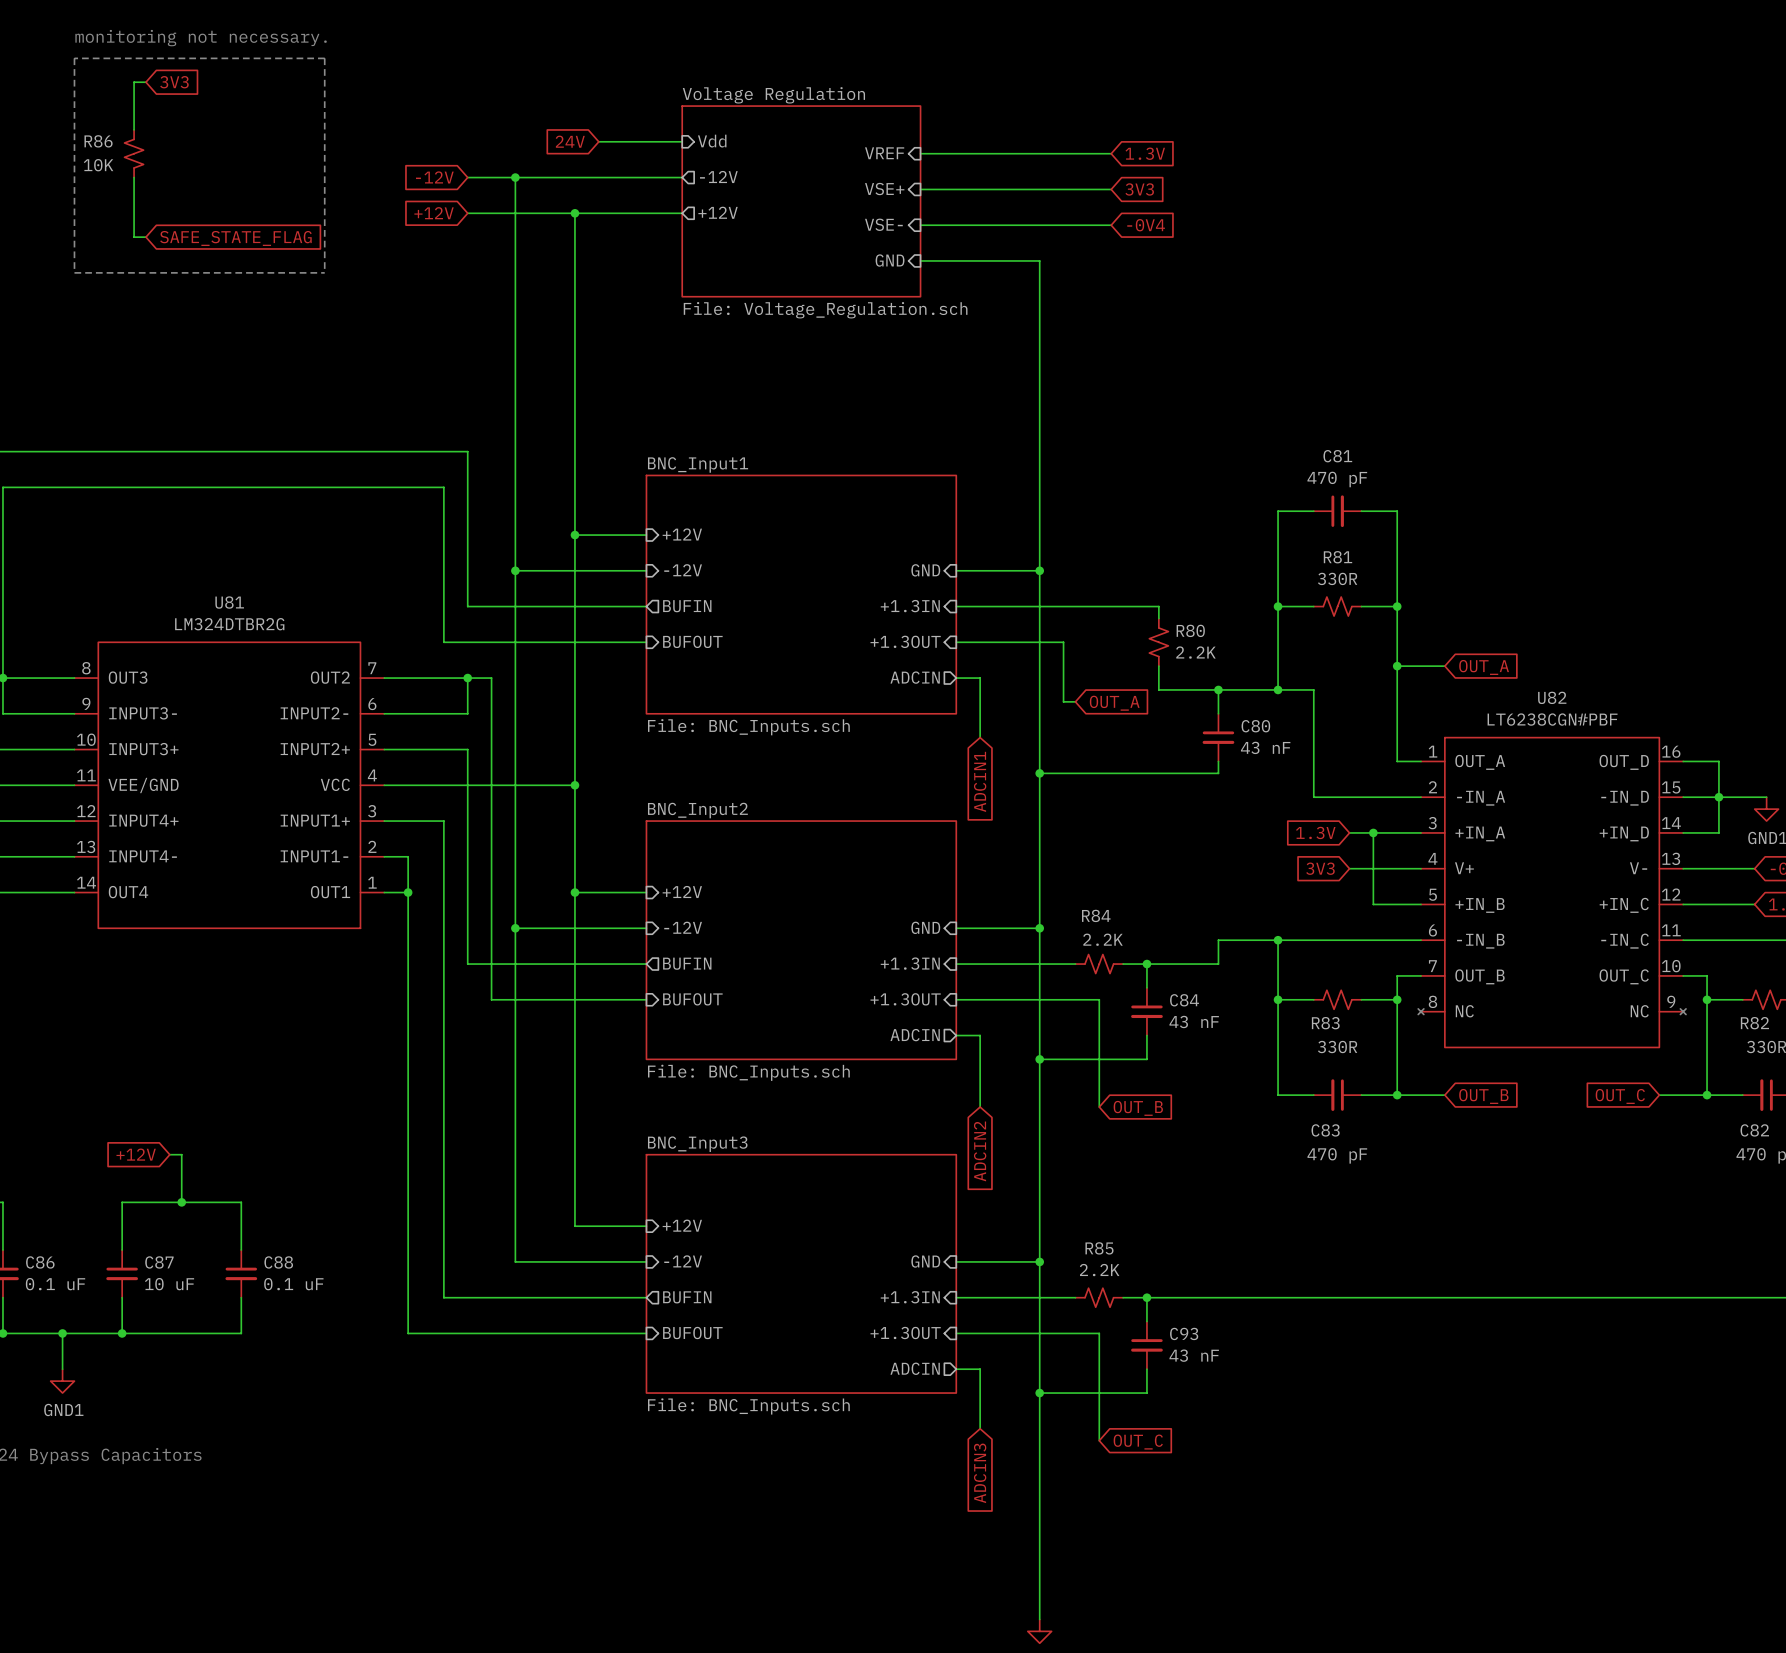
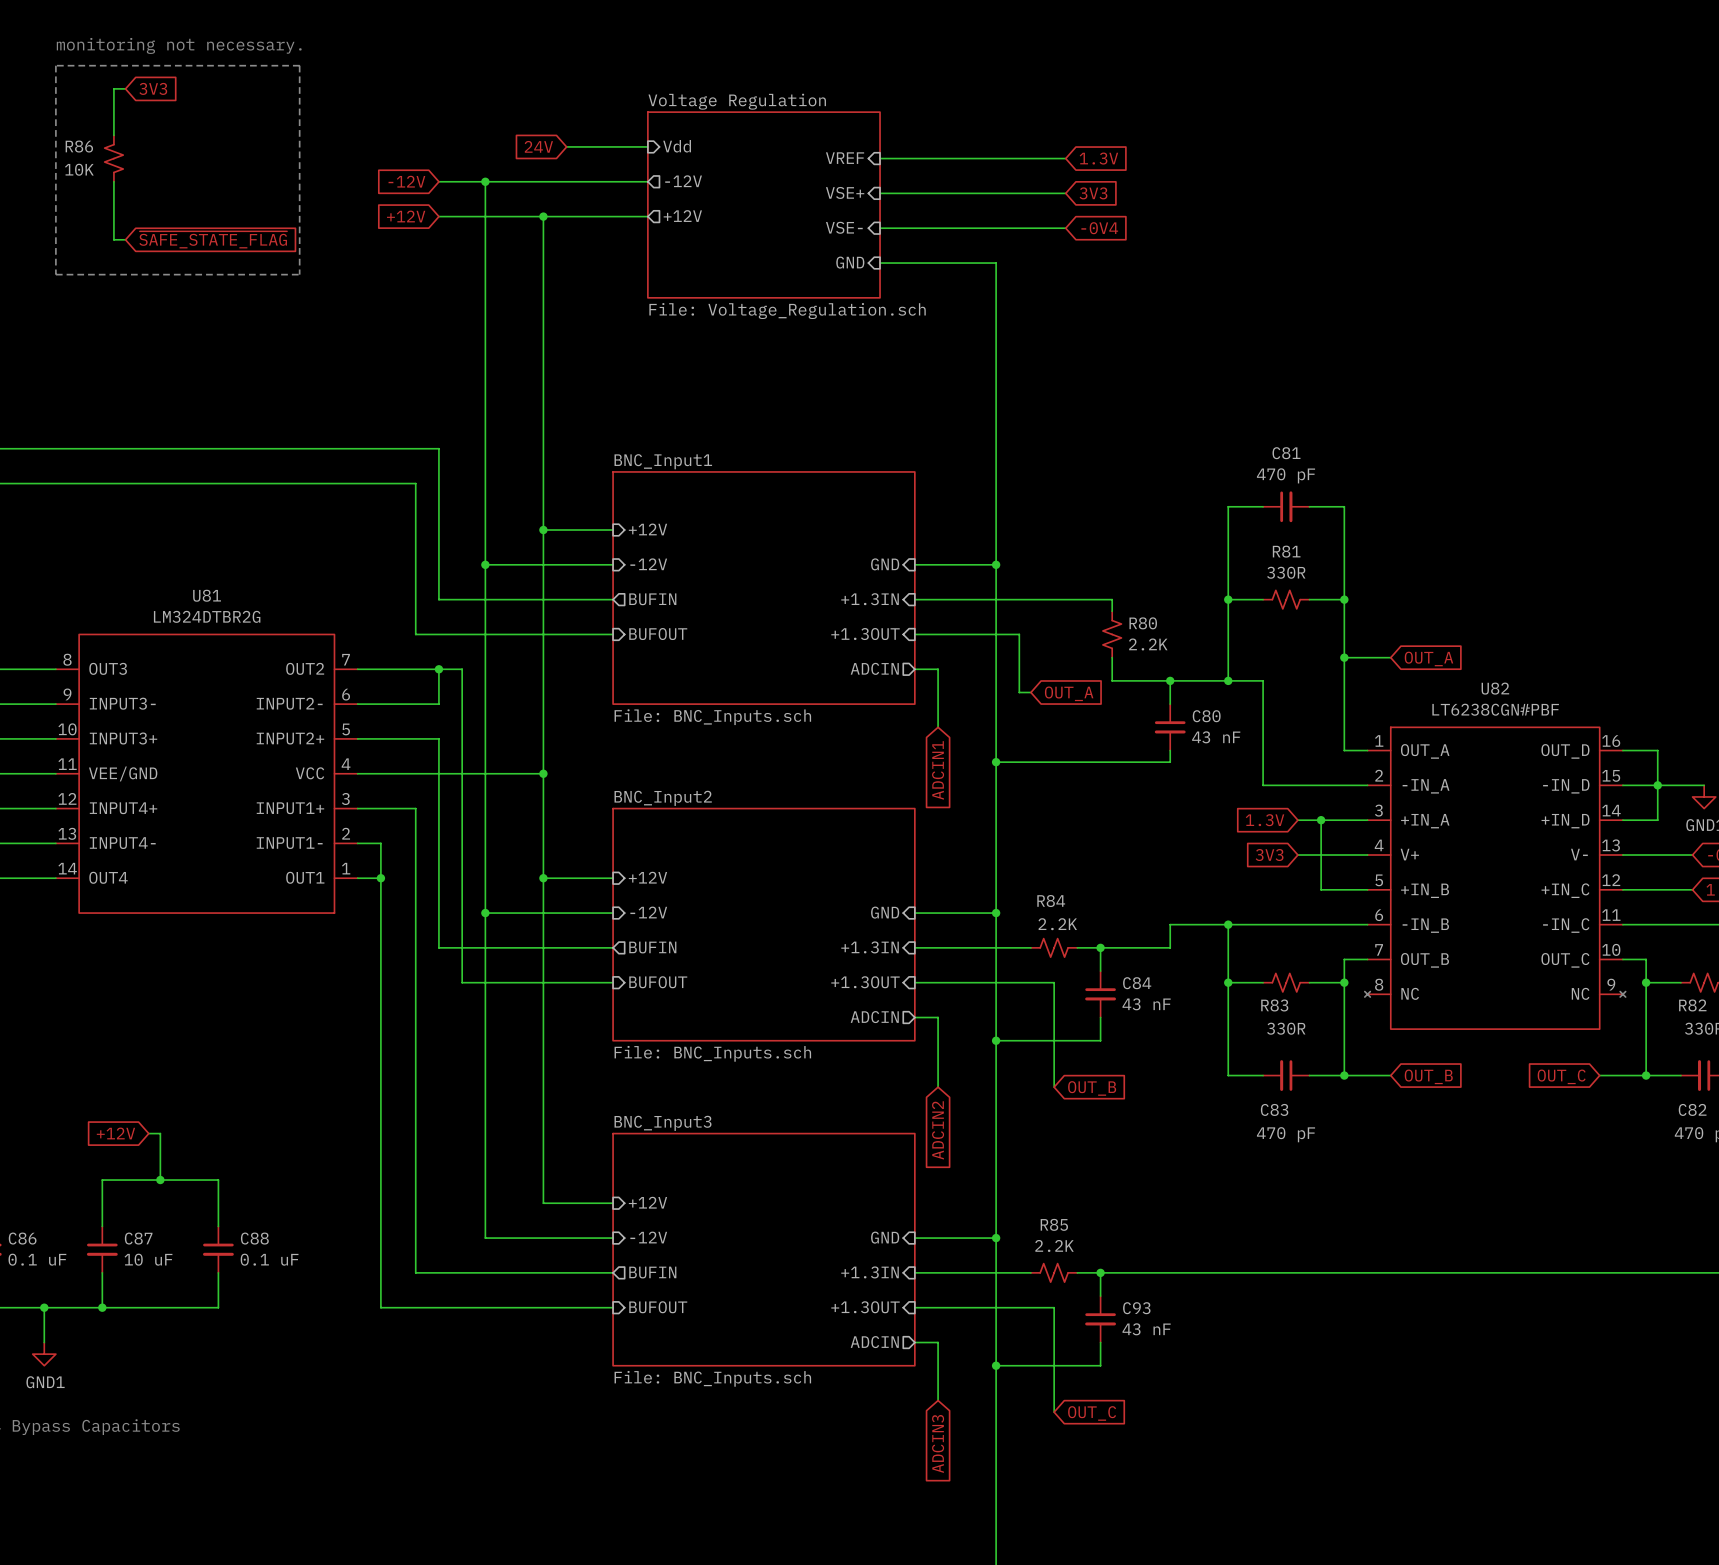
global label: SAFE_STATE_FLAG (235, 238) -> ~{SAFE_STATE_FLAG} (213, 239)

